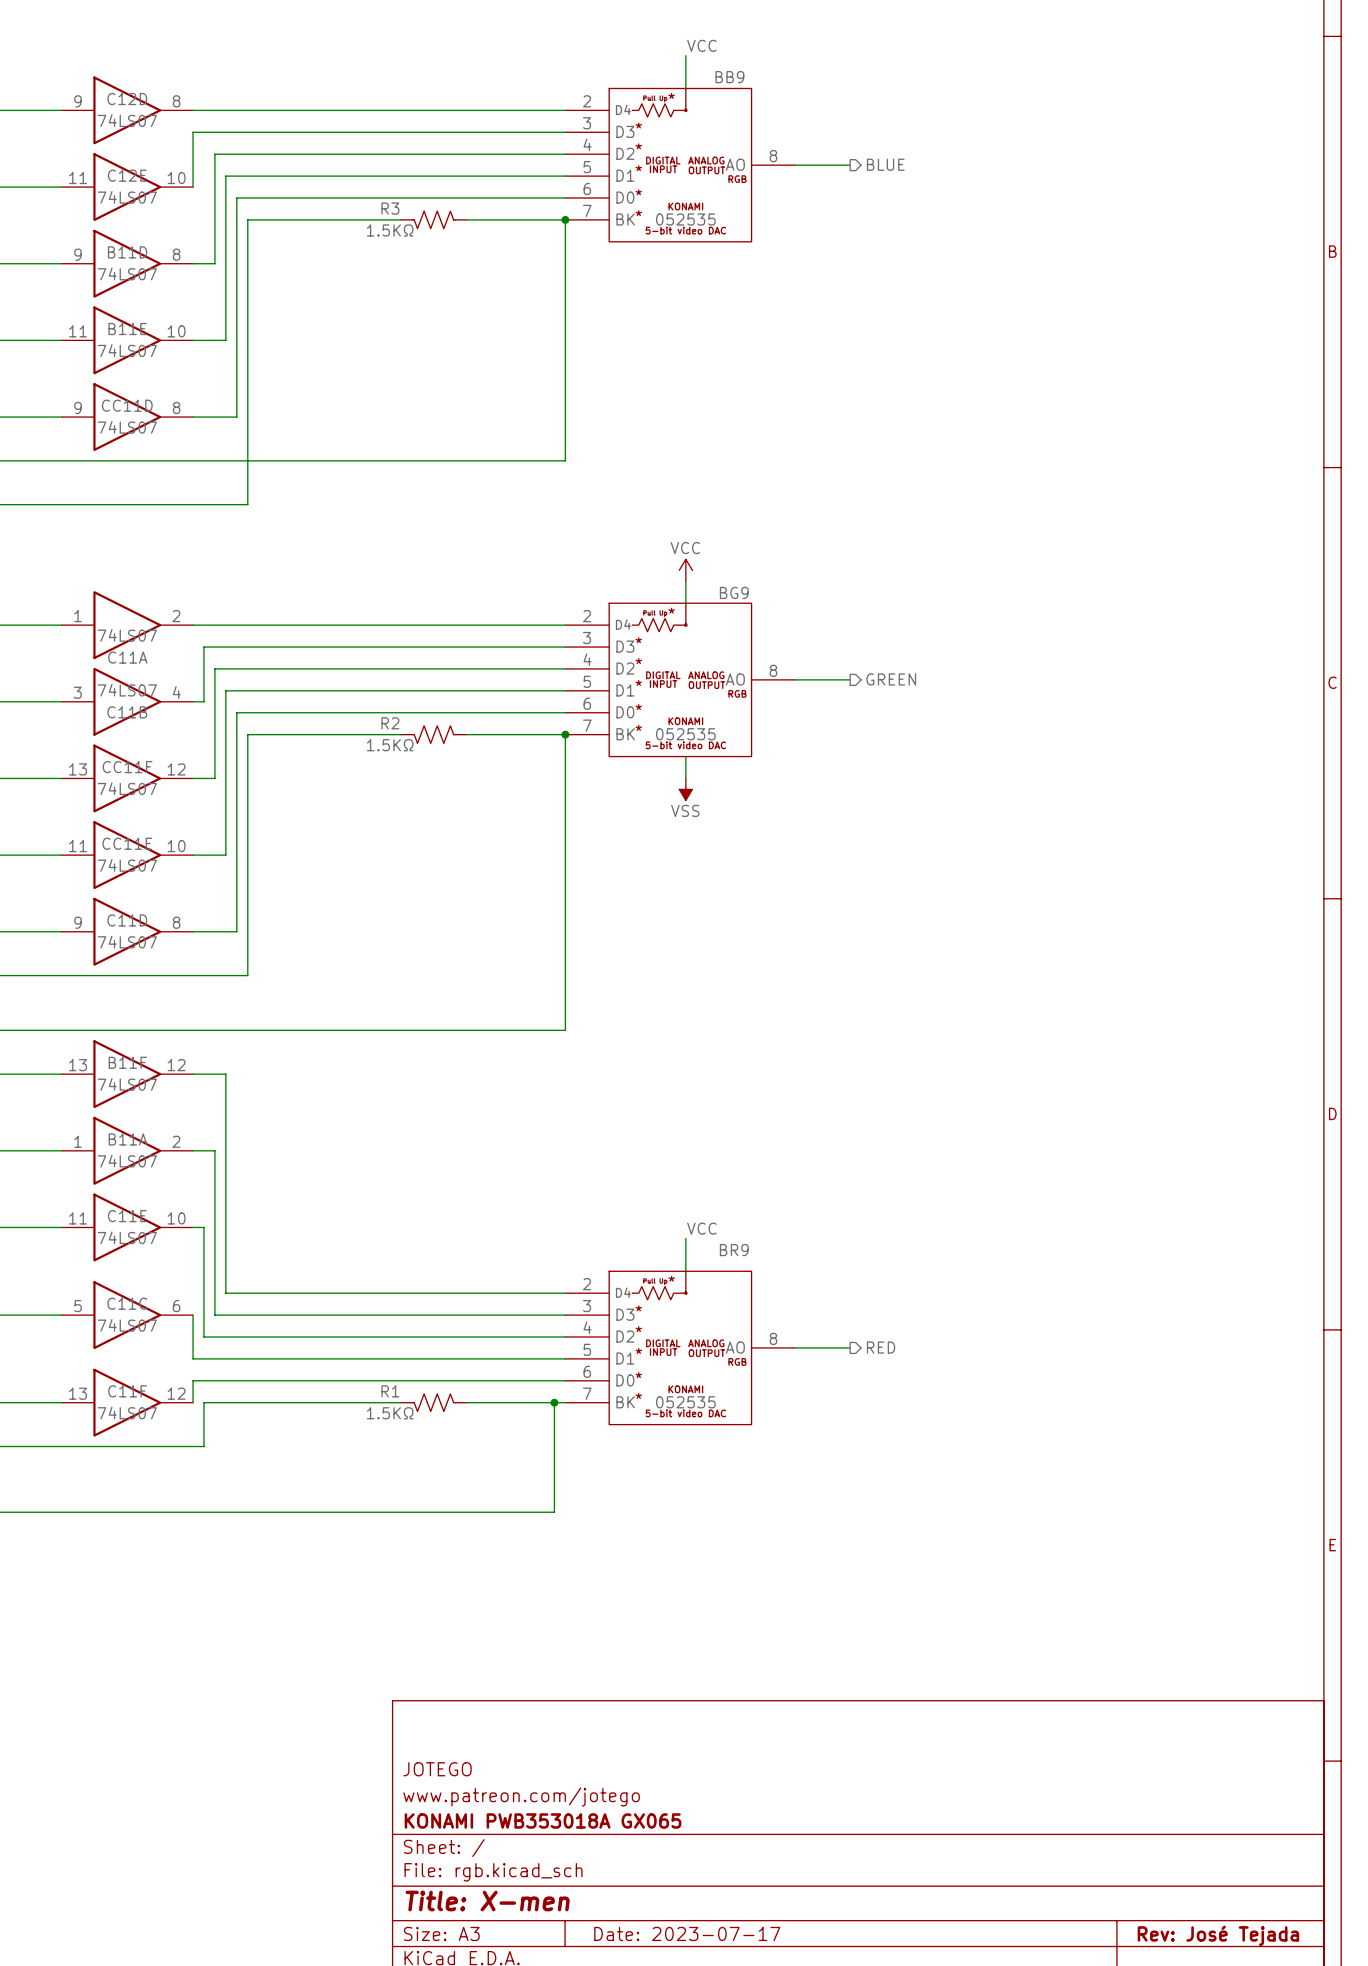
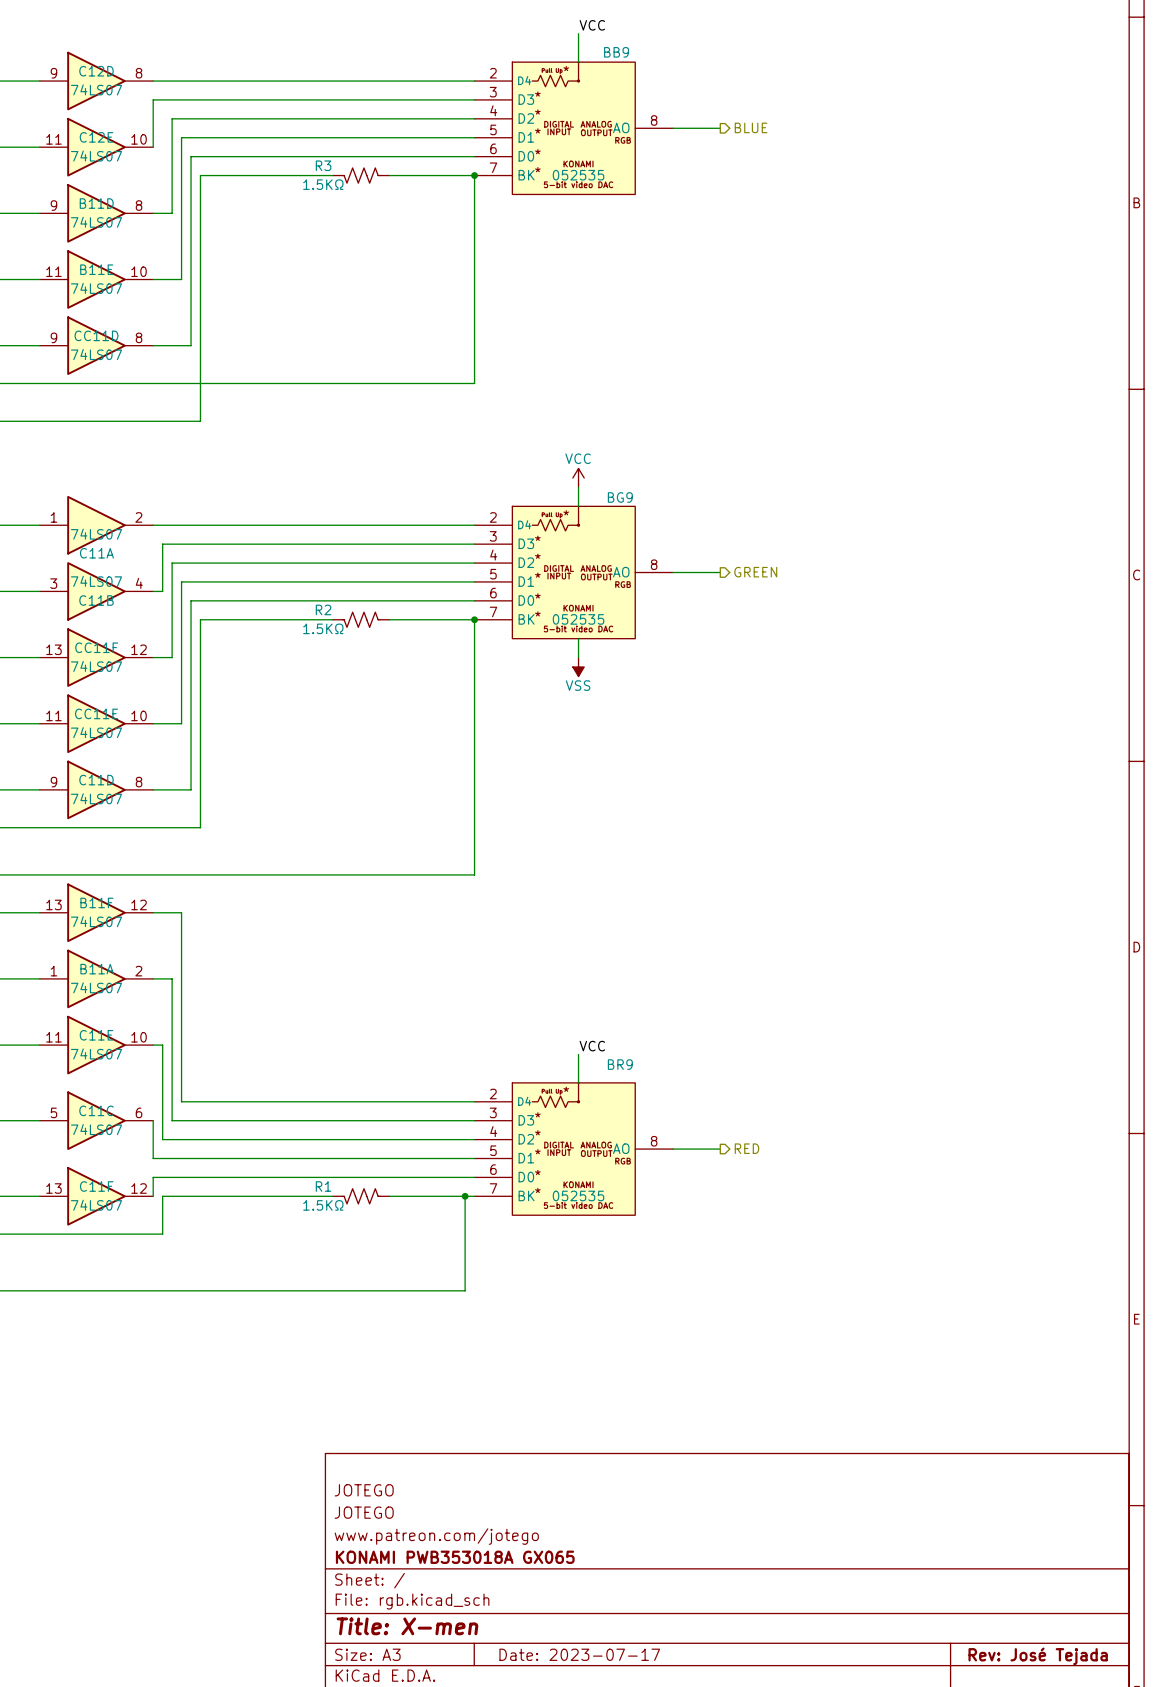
title block: none -> JOTEGO (364, 1490)

